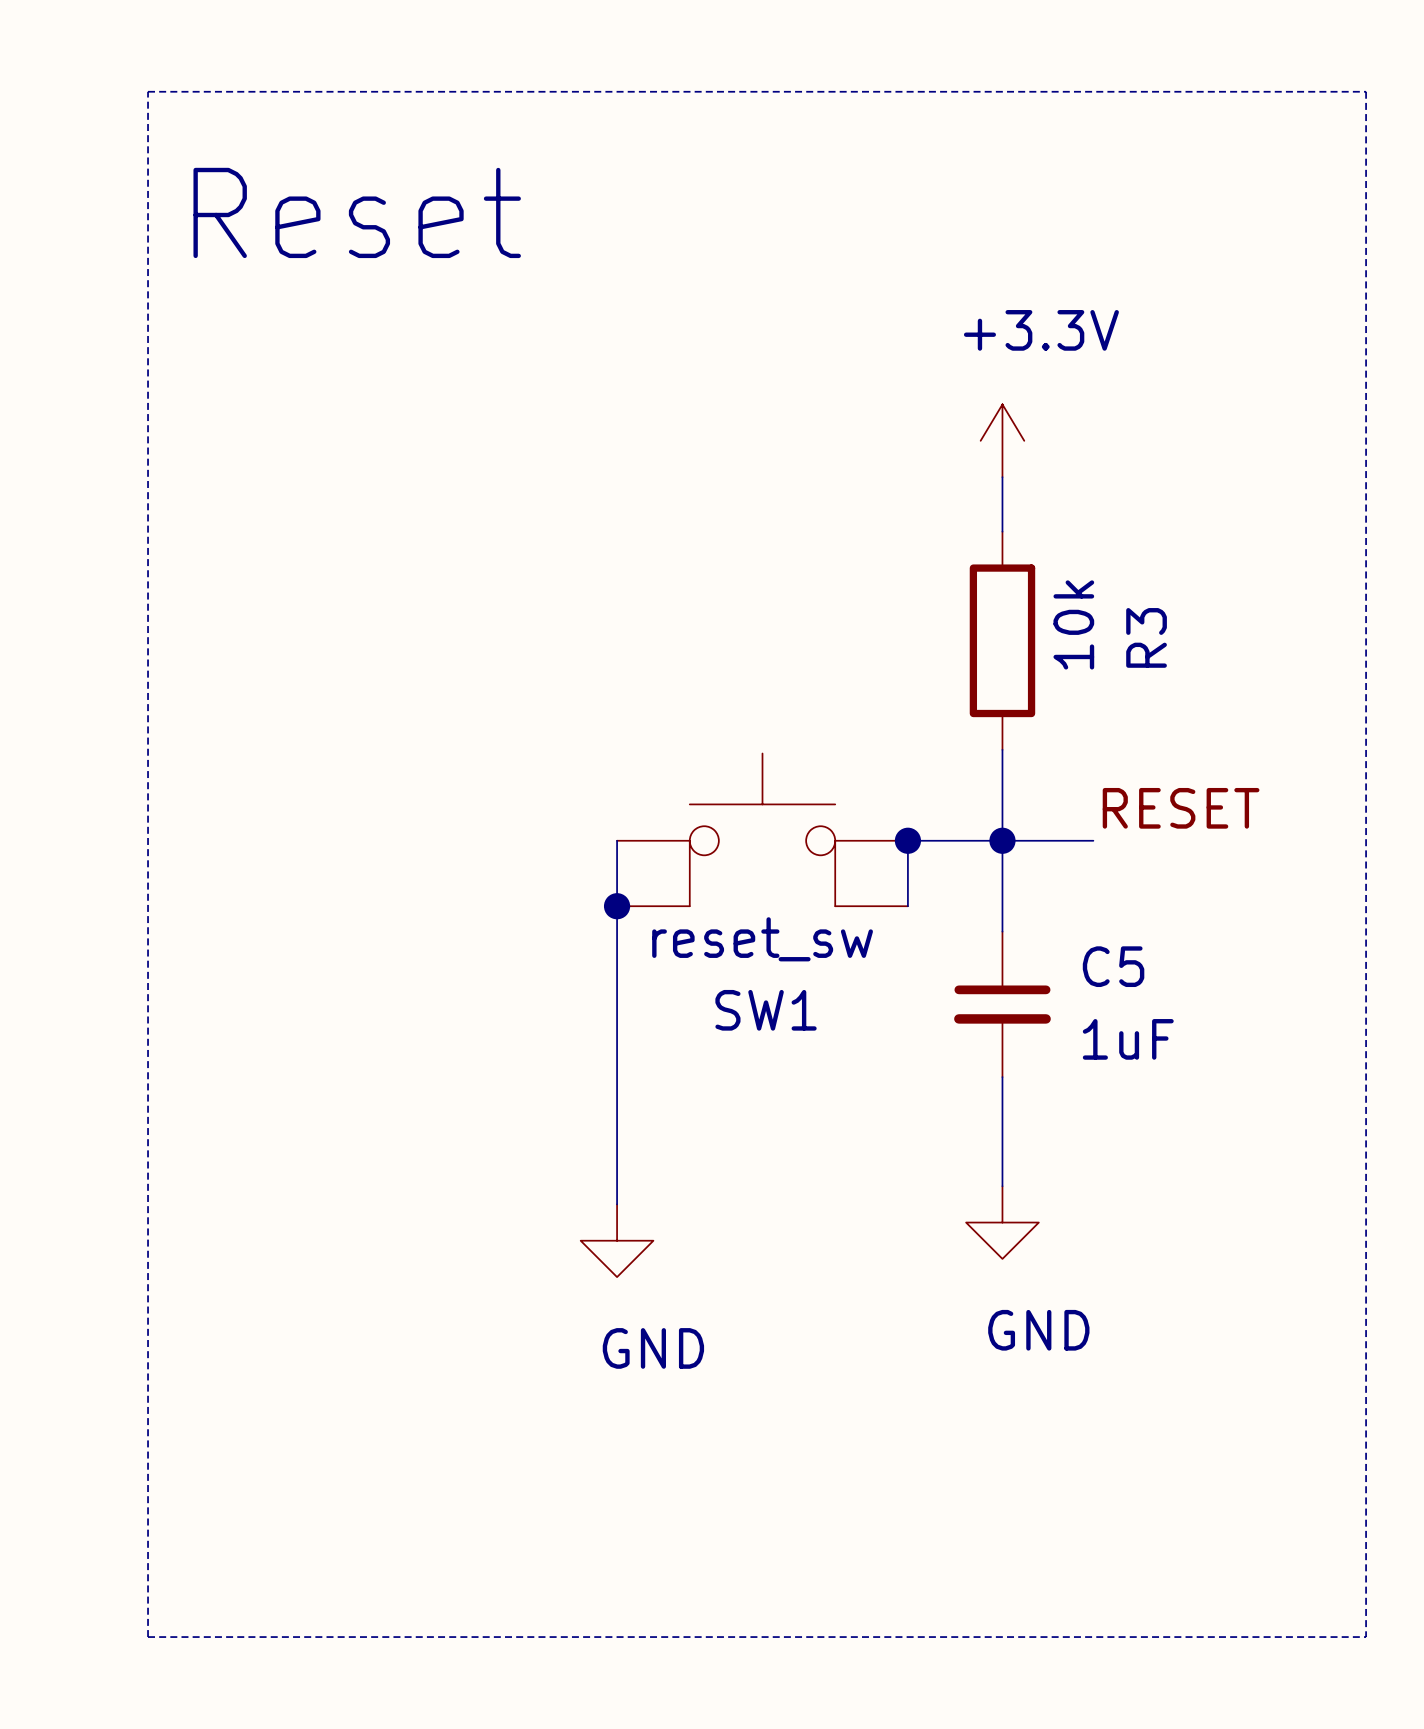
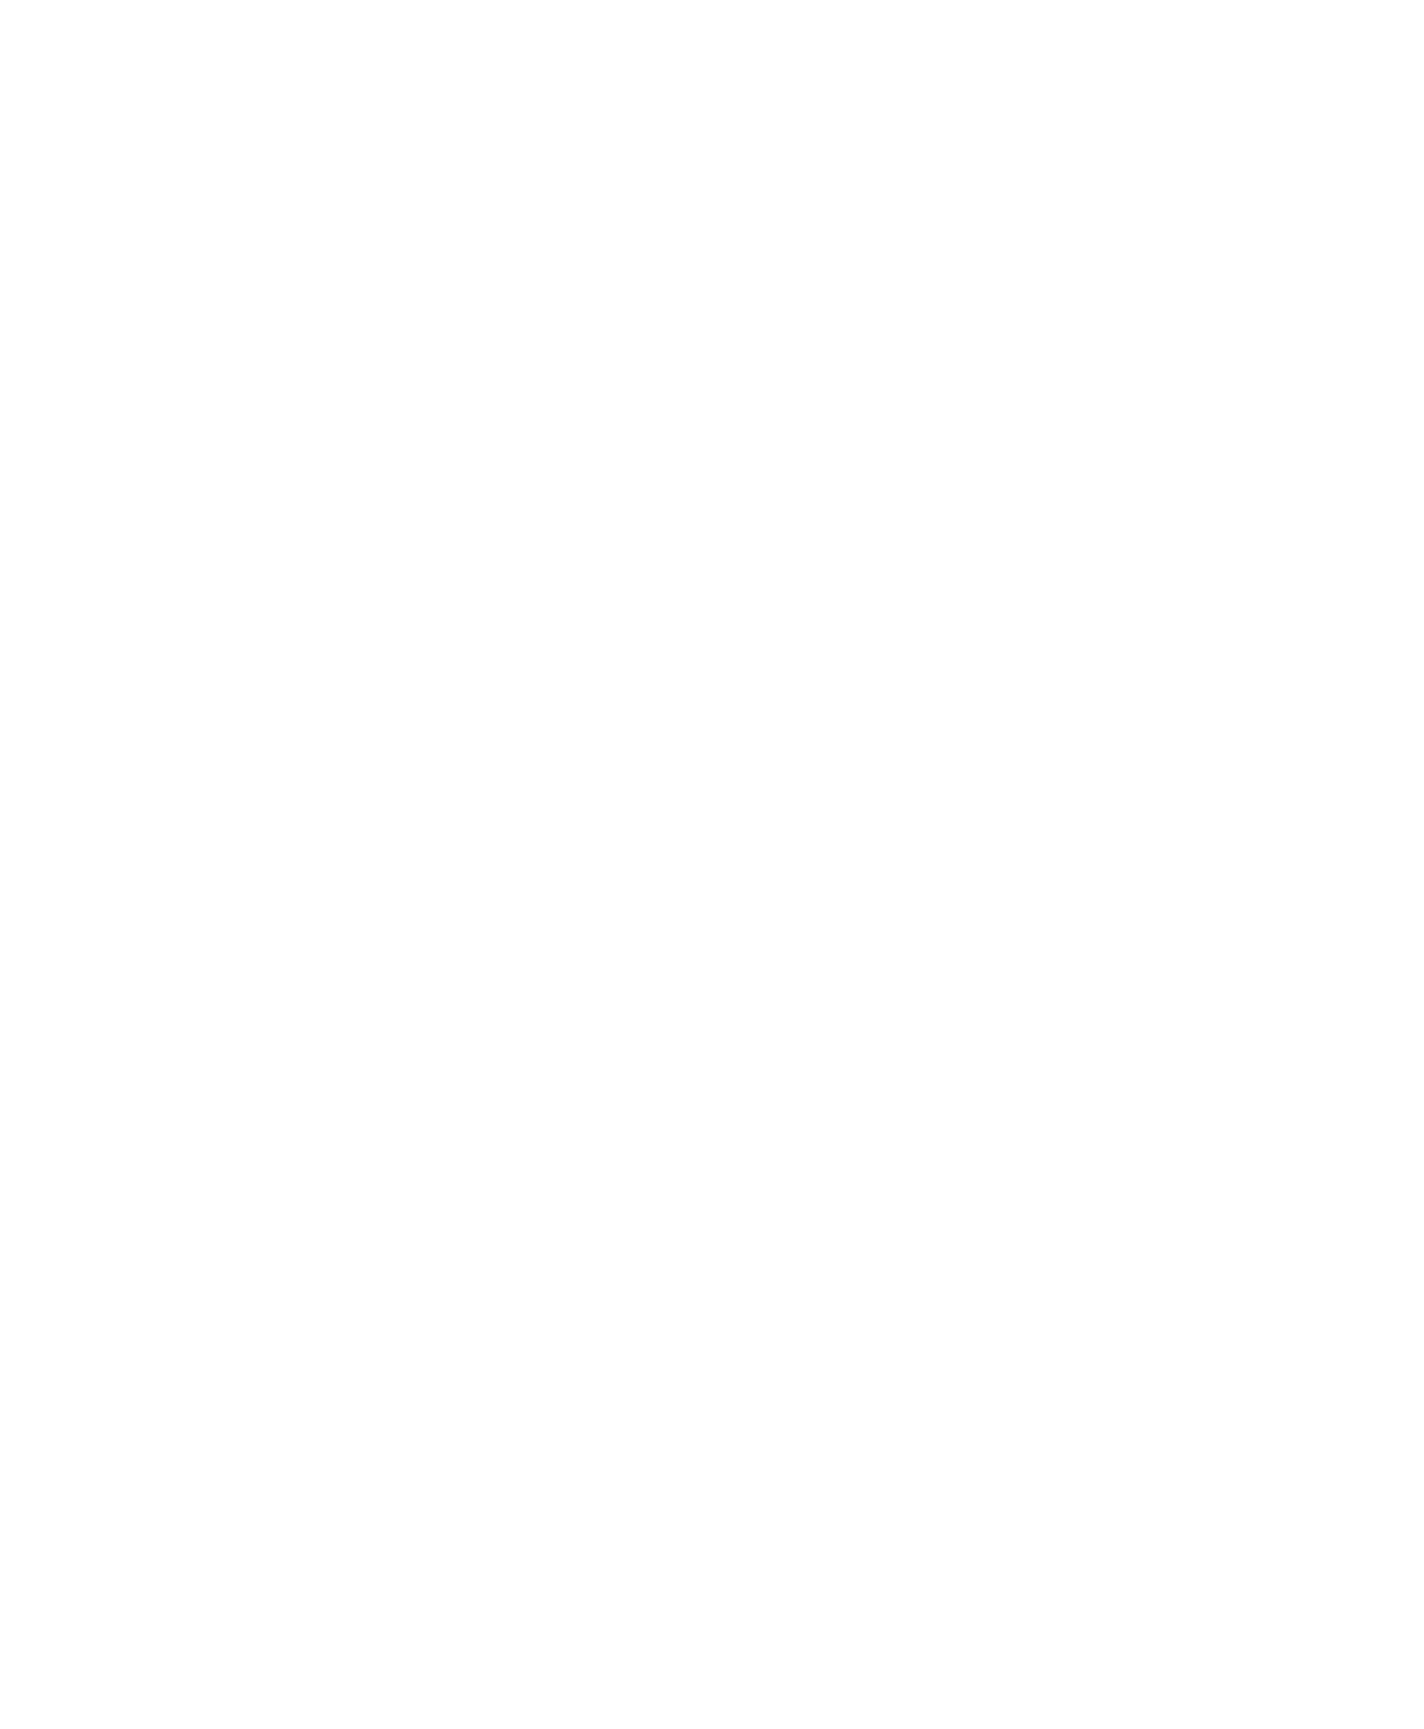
line: (148, 91) (1366, 91) (1366, 1637) (148, 1637) (148, 91) -> none
text: Reset (357, 212) -> none
power symbol: +3.3V (1002, 440) -> none
wire: (1002, 477) (1002, 531) -> none
R3: 10k (1002, 640) -> none
wire: (1002, 749) (1002, 931) -> none
label: RESET (1181, 808) -> none
SW1: reset_sw (762, 829) -> none
wire: (617, 840) (617, 1204) -> none
junction: (907, 840) -> none
junction: (1002, 840) -> none
wire: (1093, 840) (907, 840) (907, 906) -> none
junction: (617, 906) -> none
C5: 1uF (1002, 1004) -> none
wire: (1002, 1077) (1002, 1186) -> none
power symbol: GND (1002, 1222) -> none
power symbol: GND (617, 1240) -> none

